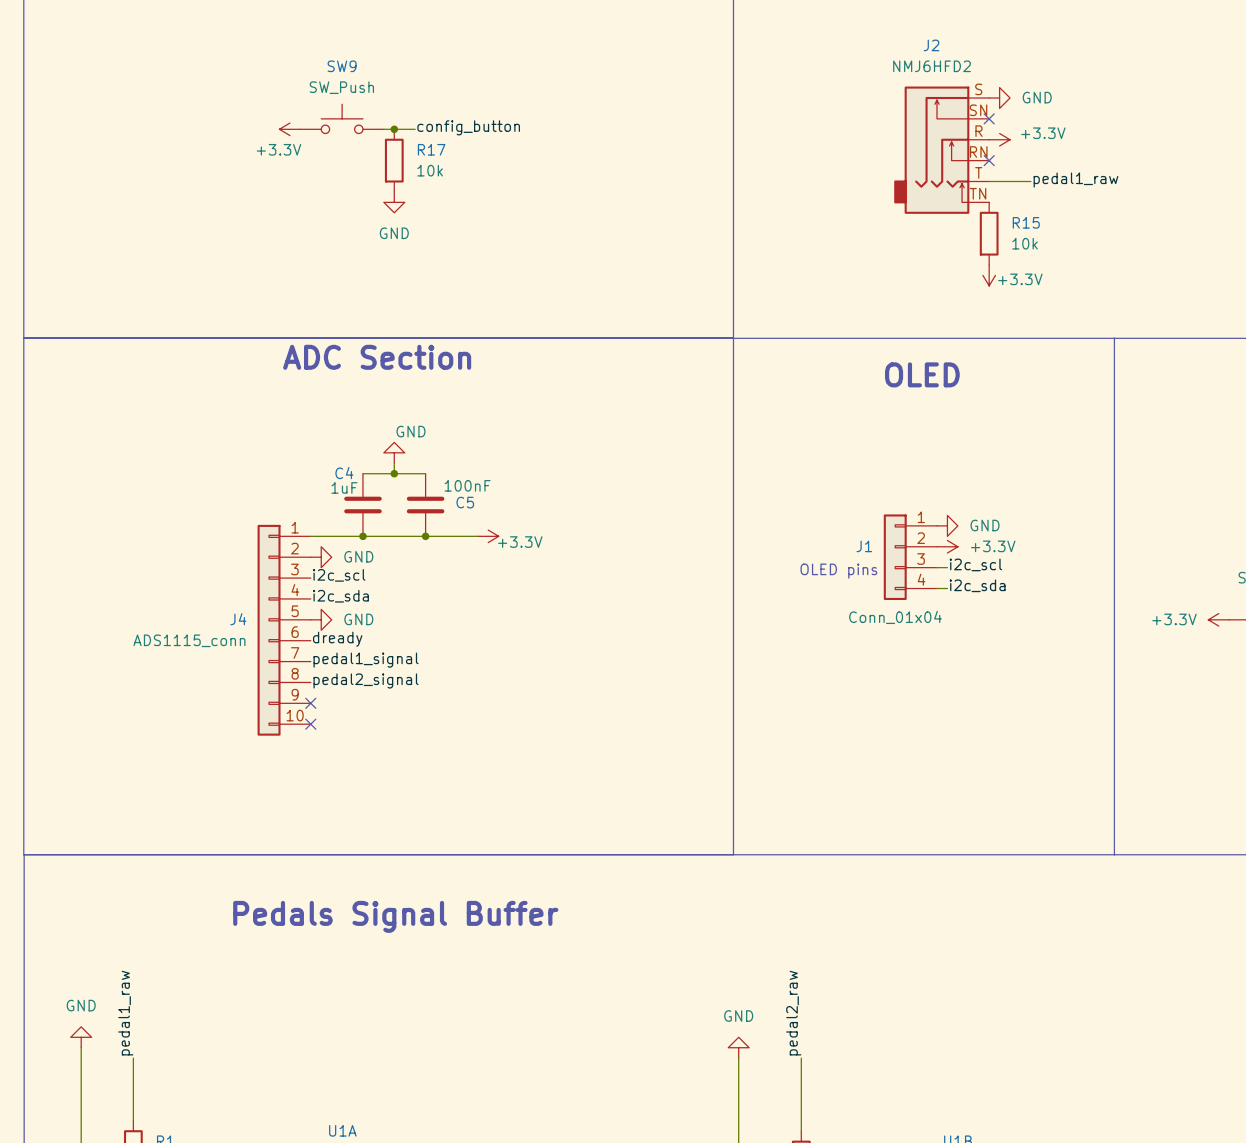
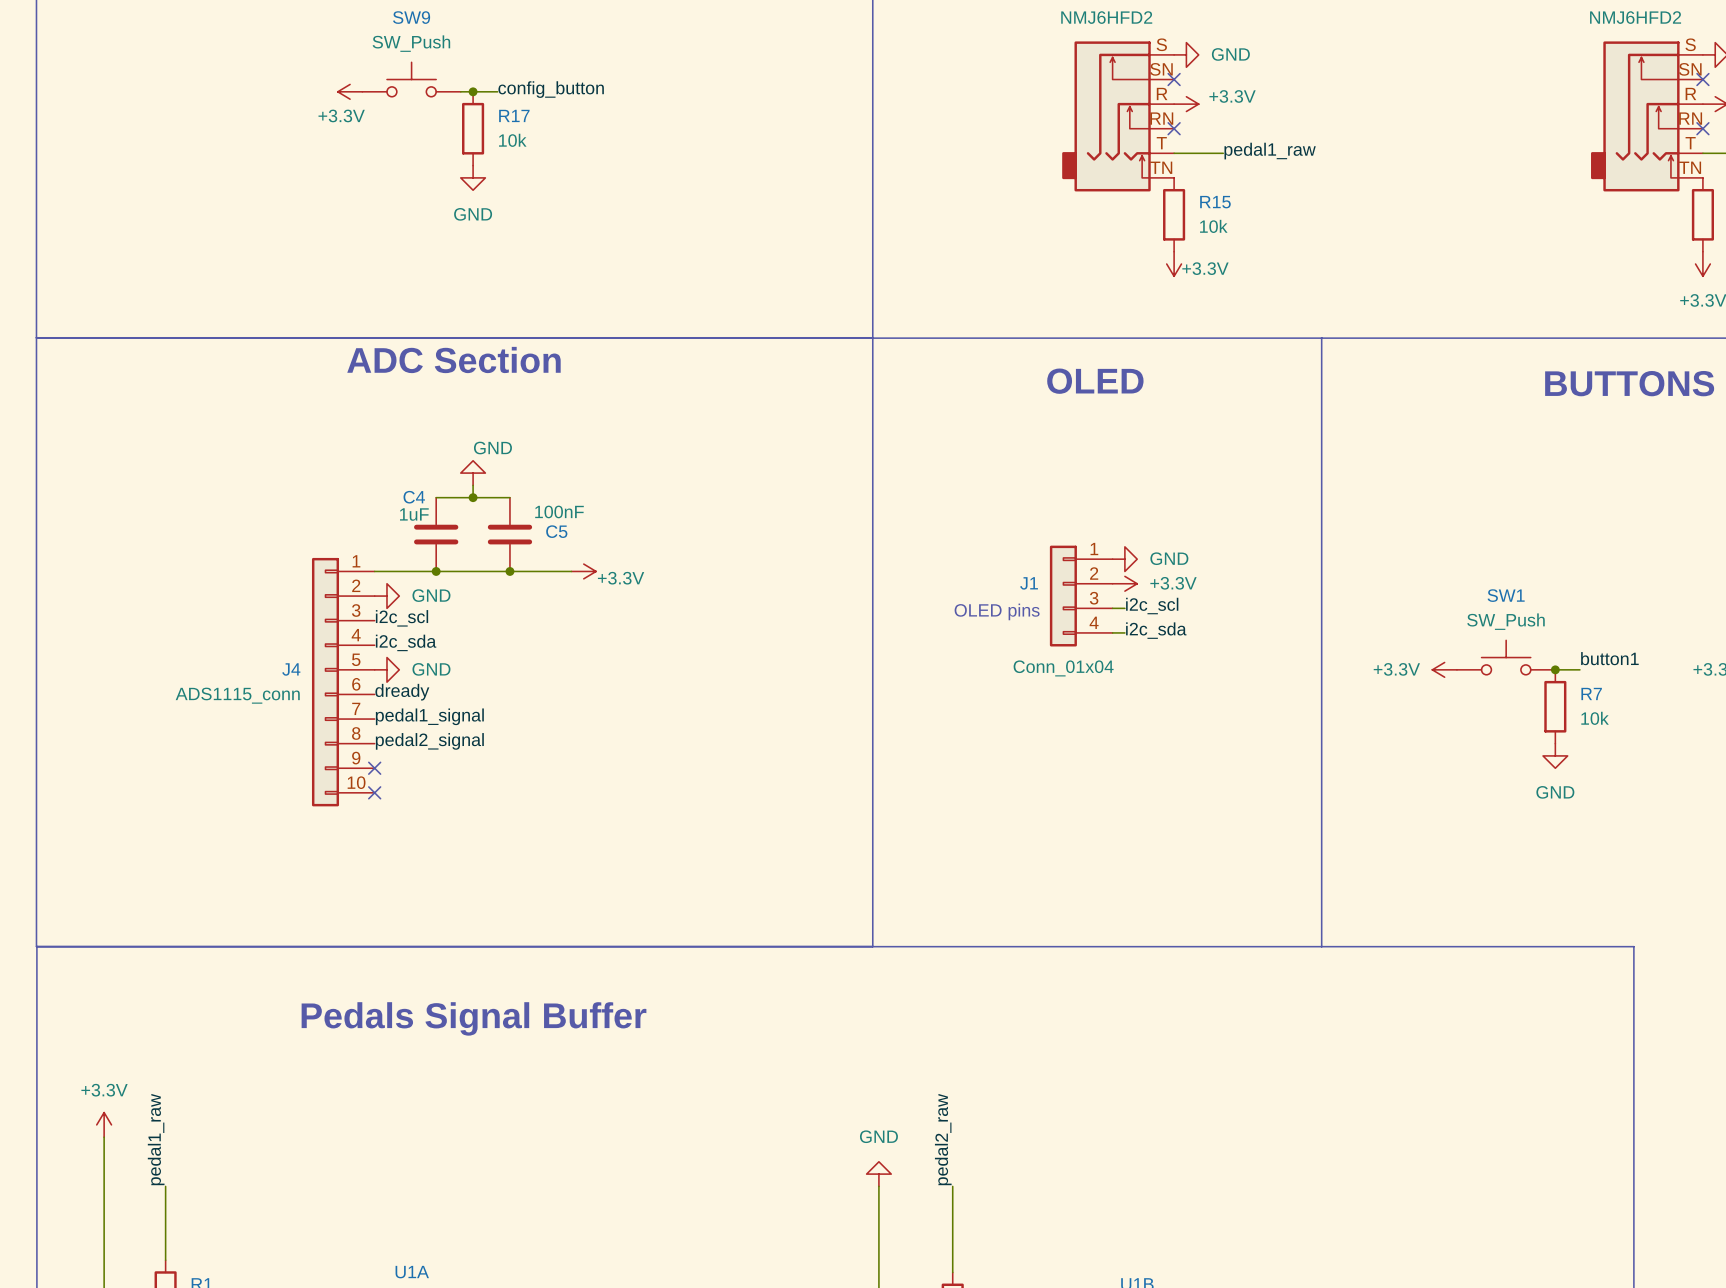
power symbol: none -> +3.3V (104, 1124)
wire: none -> (104, 1137) (104, 1174)
power symbol: GND (81, 1037) -> none

